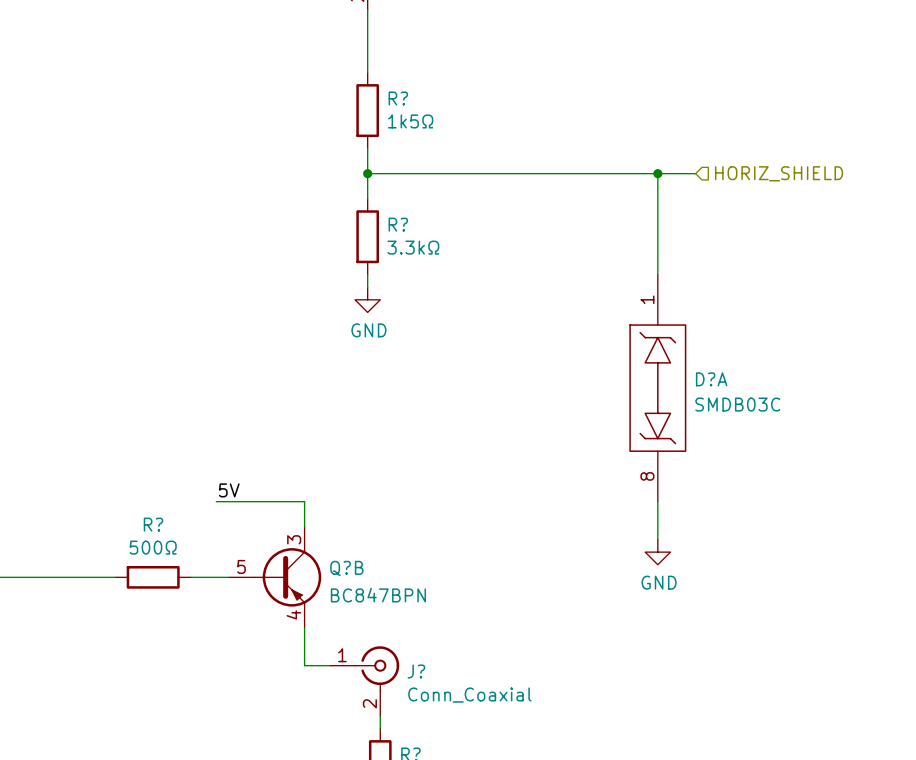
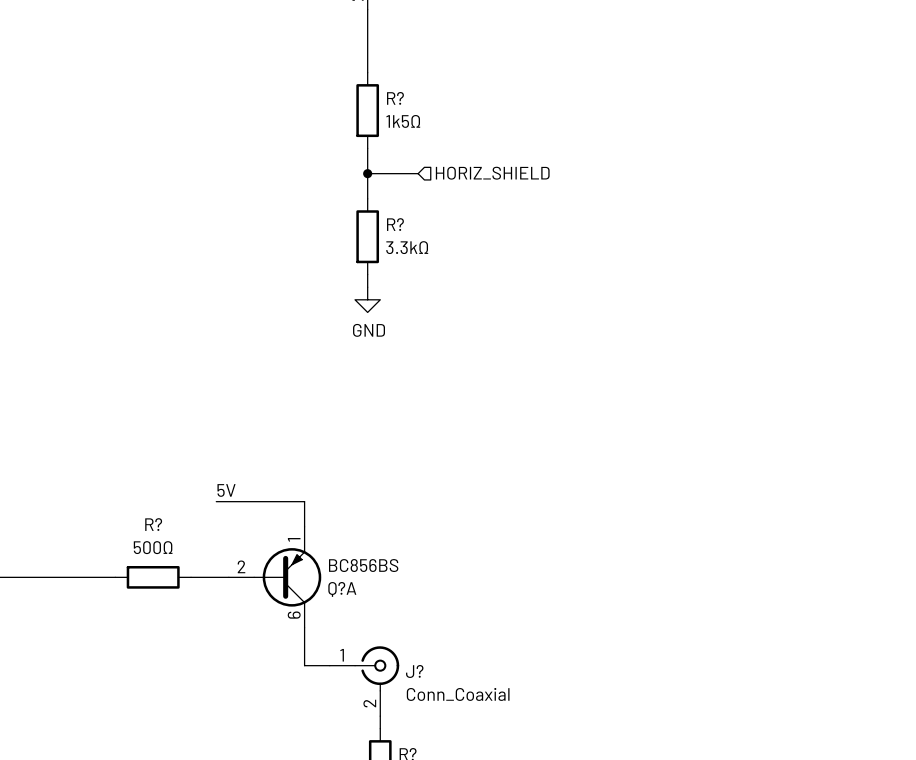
wire: (418, 173) (695, 173) -> none
hierarchical label: none -> HORIZ_SHIELD (492, 173)
wire: (657, 173) (657, 274) -> none
junction: (657, 173) -> none
hierarchical label: HORIZ_SHIELD (779, 173) -> none
D?A: SMDB03C (657, 388) -> none
wire: (657, 501) (657, 539) -> none
power symbol: GND (657, 552) -> none
Q?B: BC847BPN (275, 577) -> none
Q?A: none -> BC856BS (275, 577)

